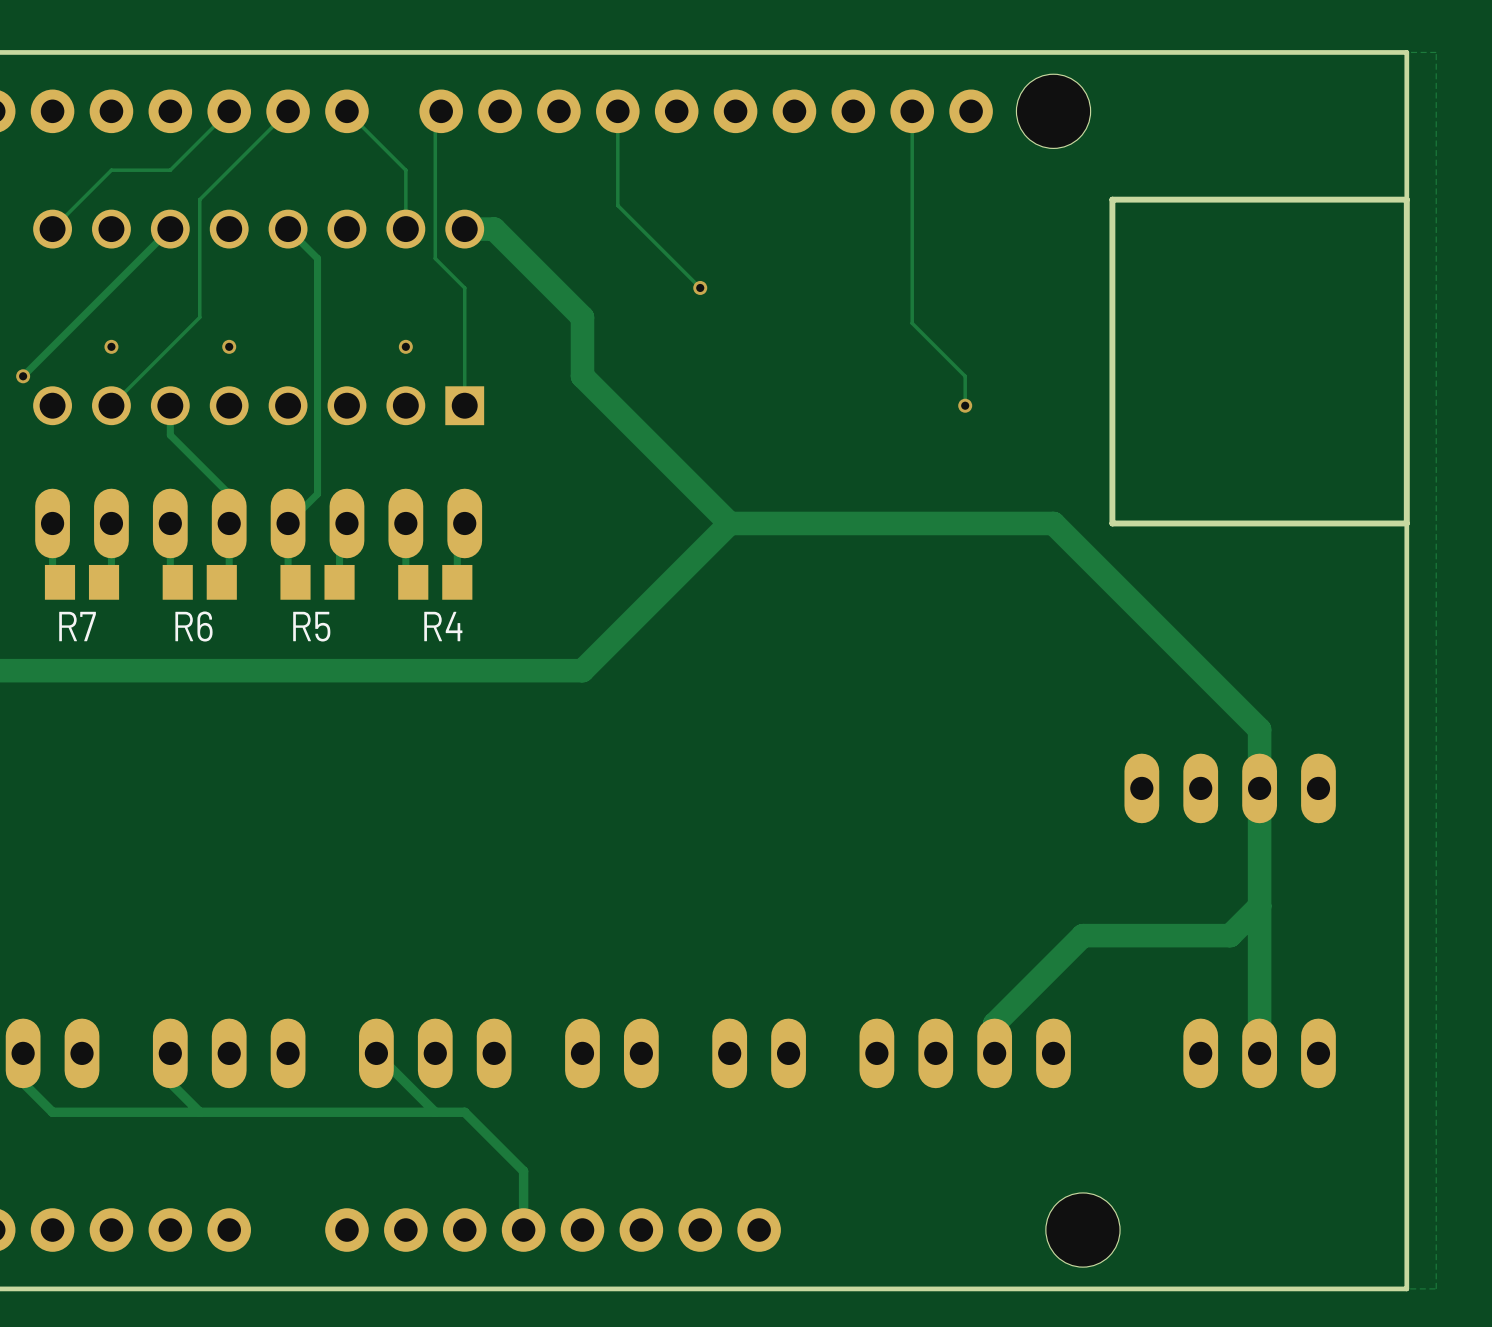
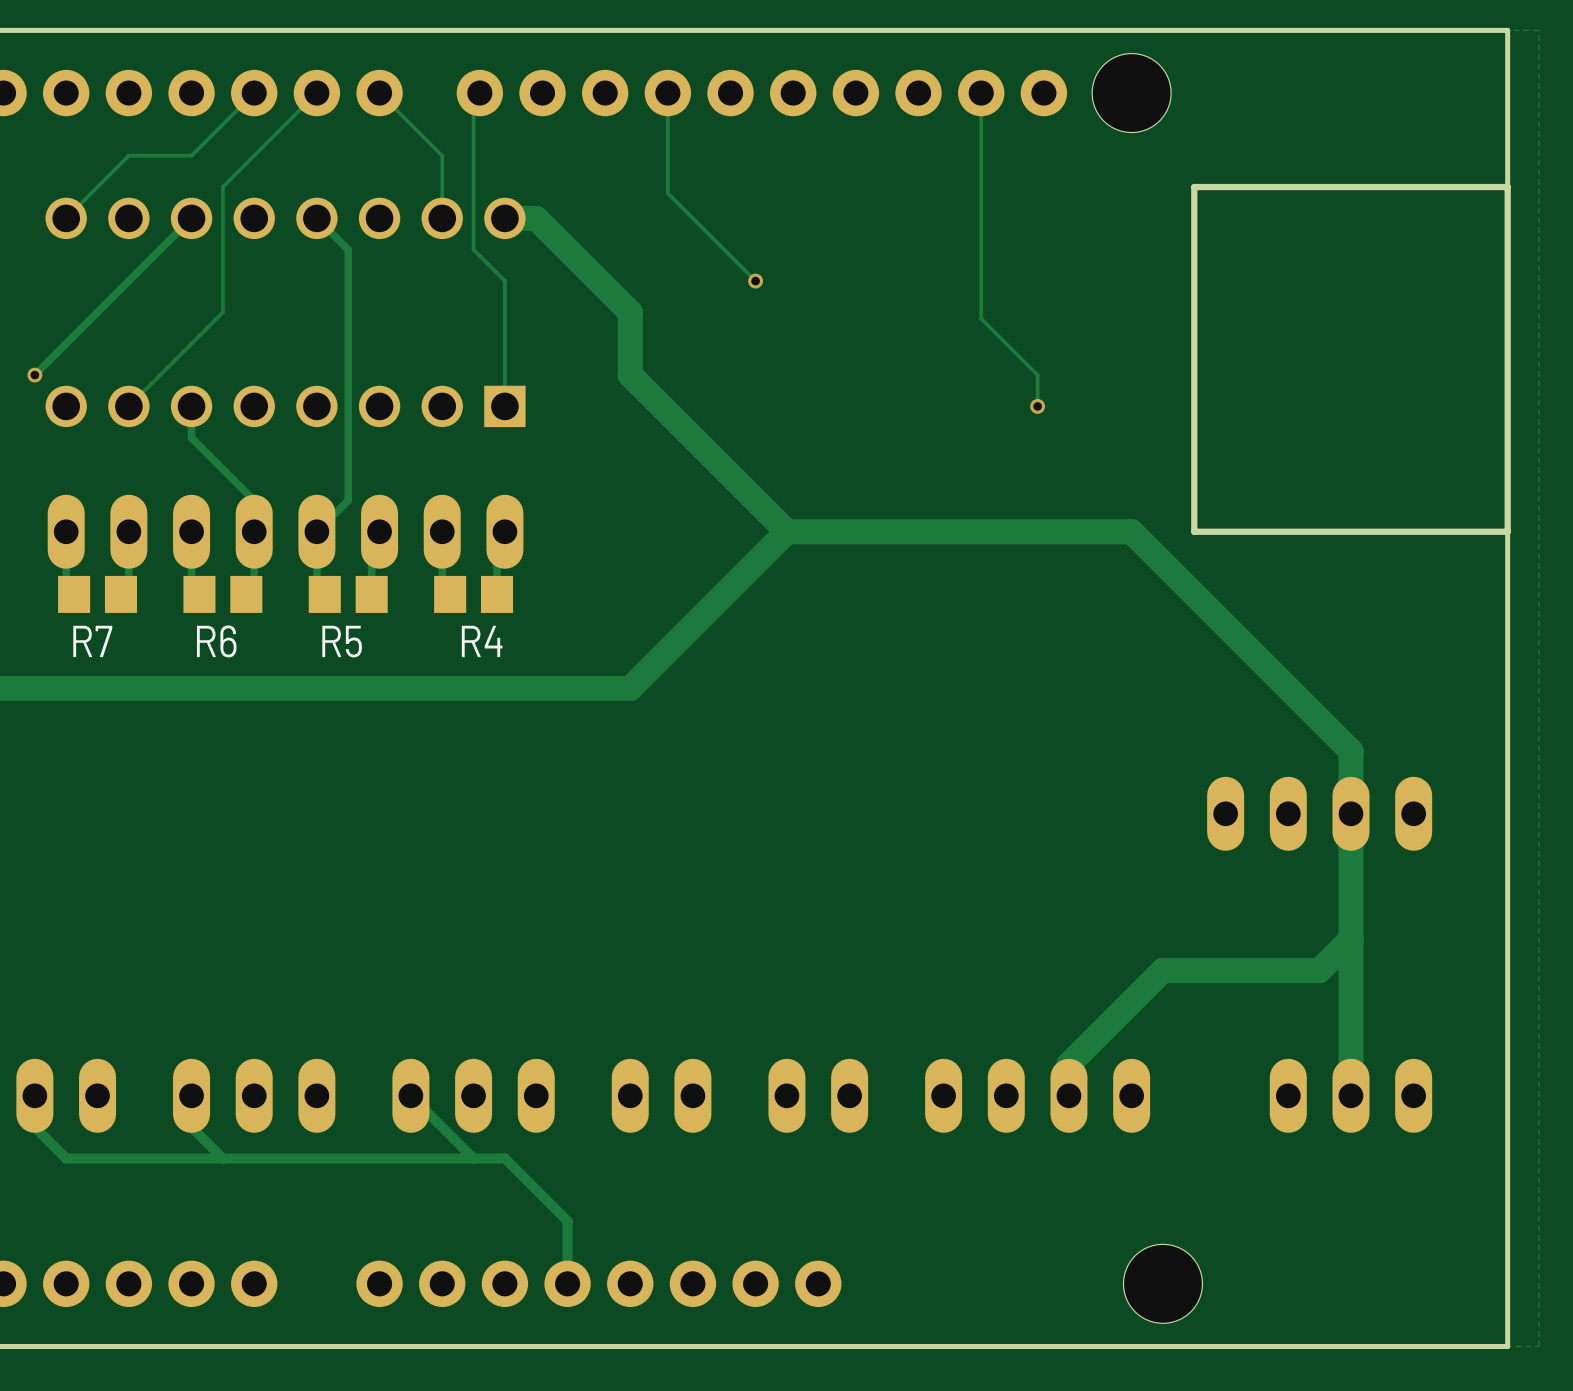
via: (111, 346) -> none
via: (229, 346) -> none
via: (405, 346) -> none

